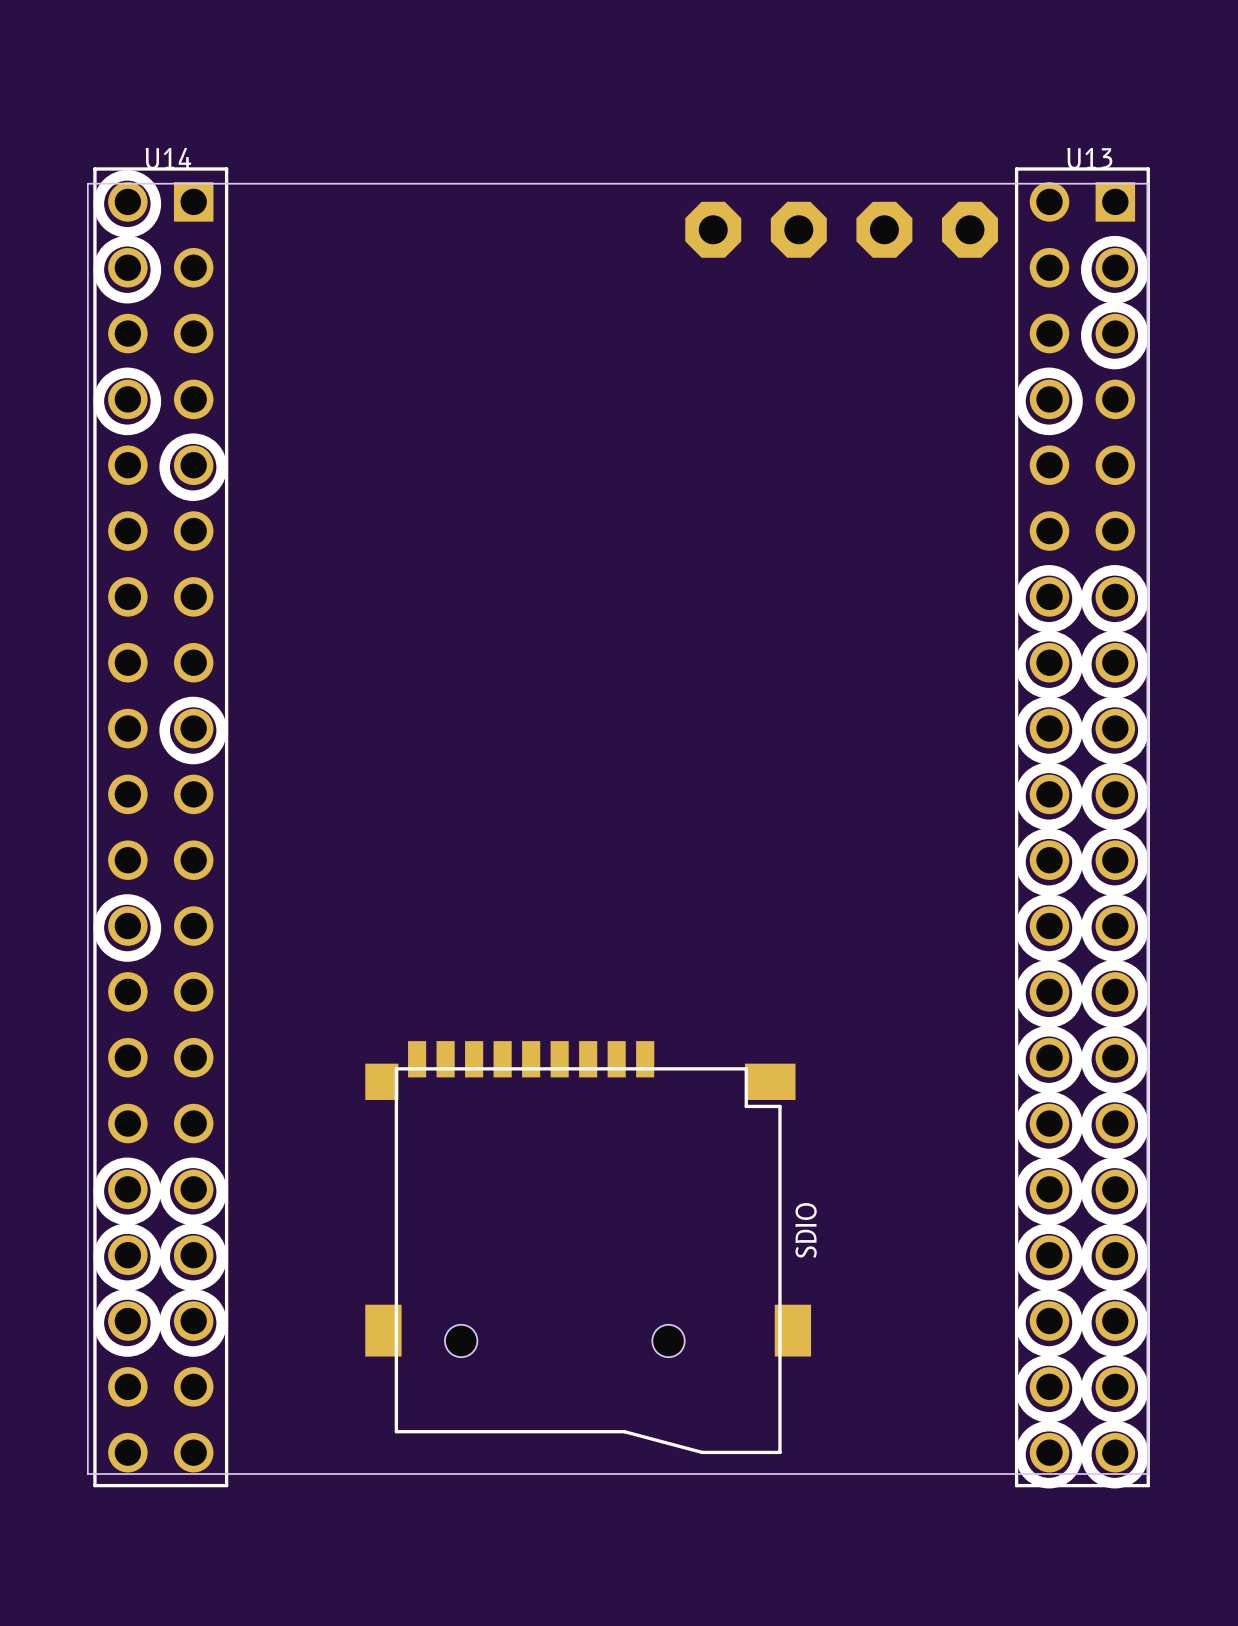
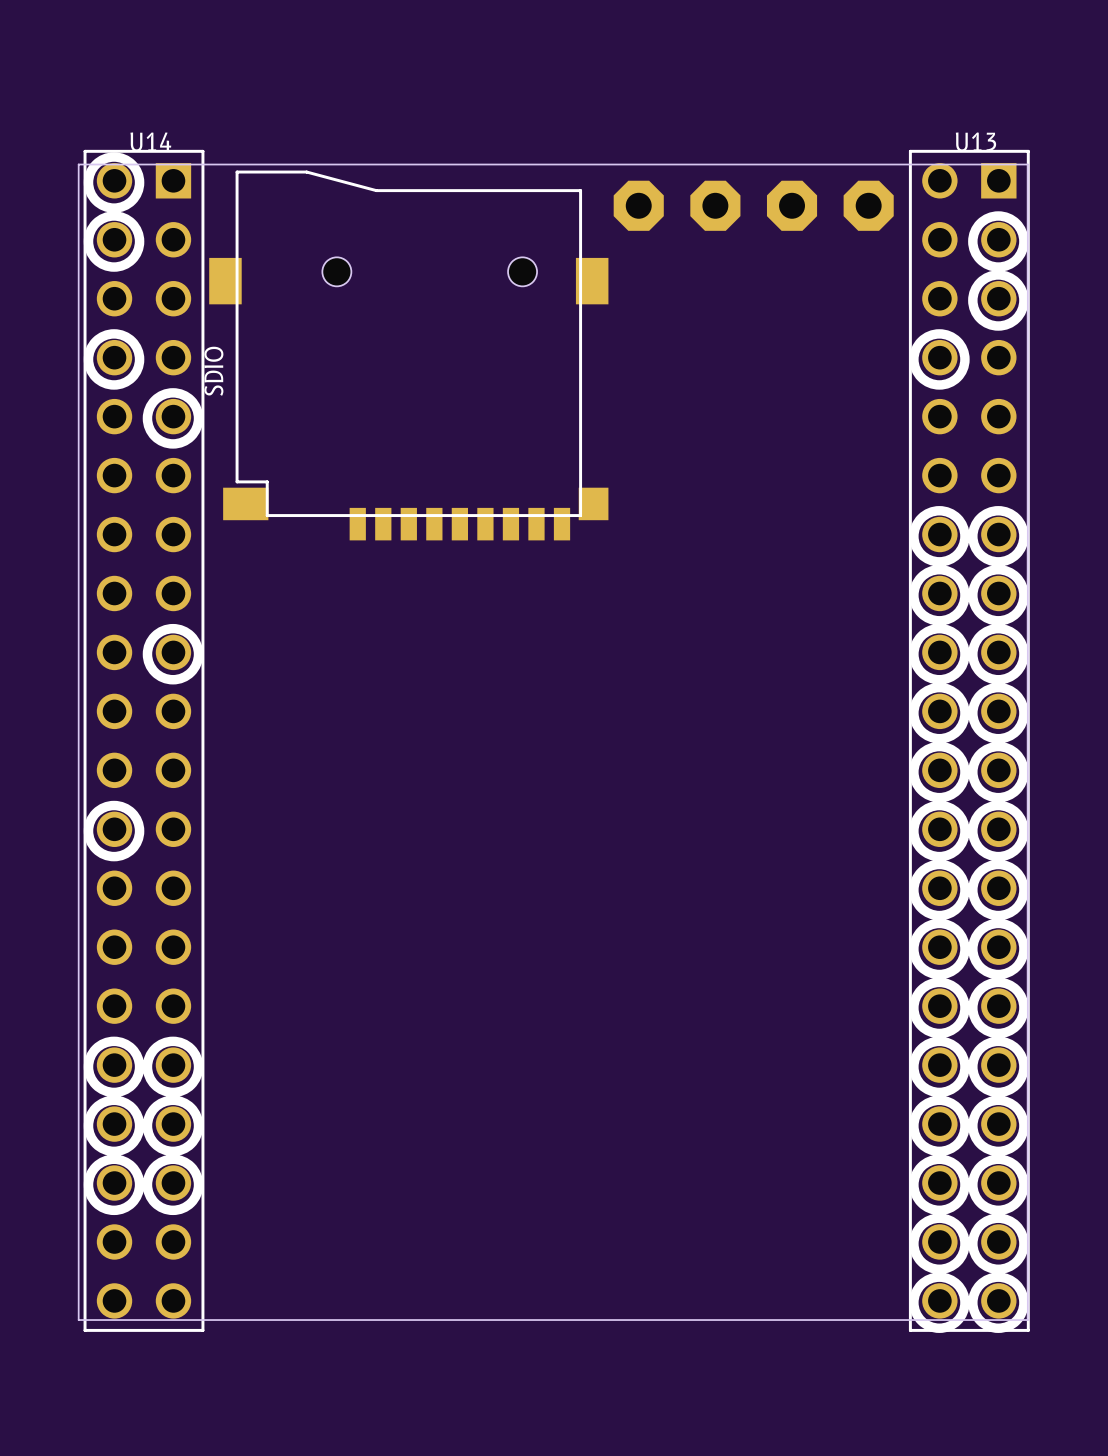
SDIO: none -> (408, 355)
SDIO: (588, 1247) -> none

